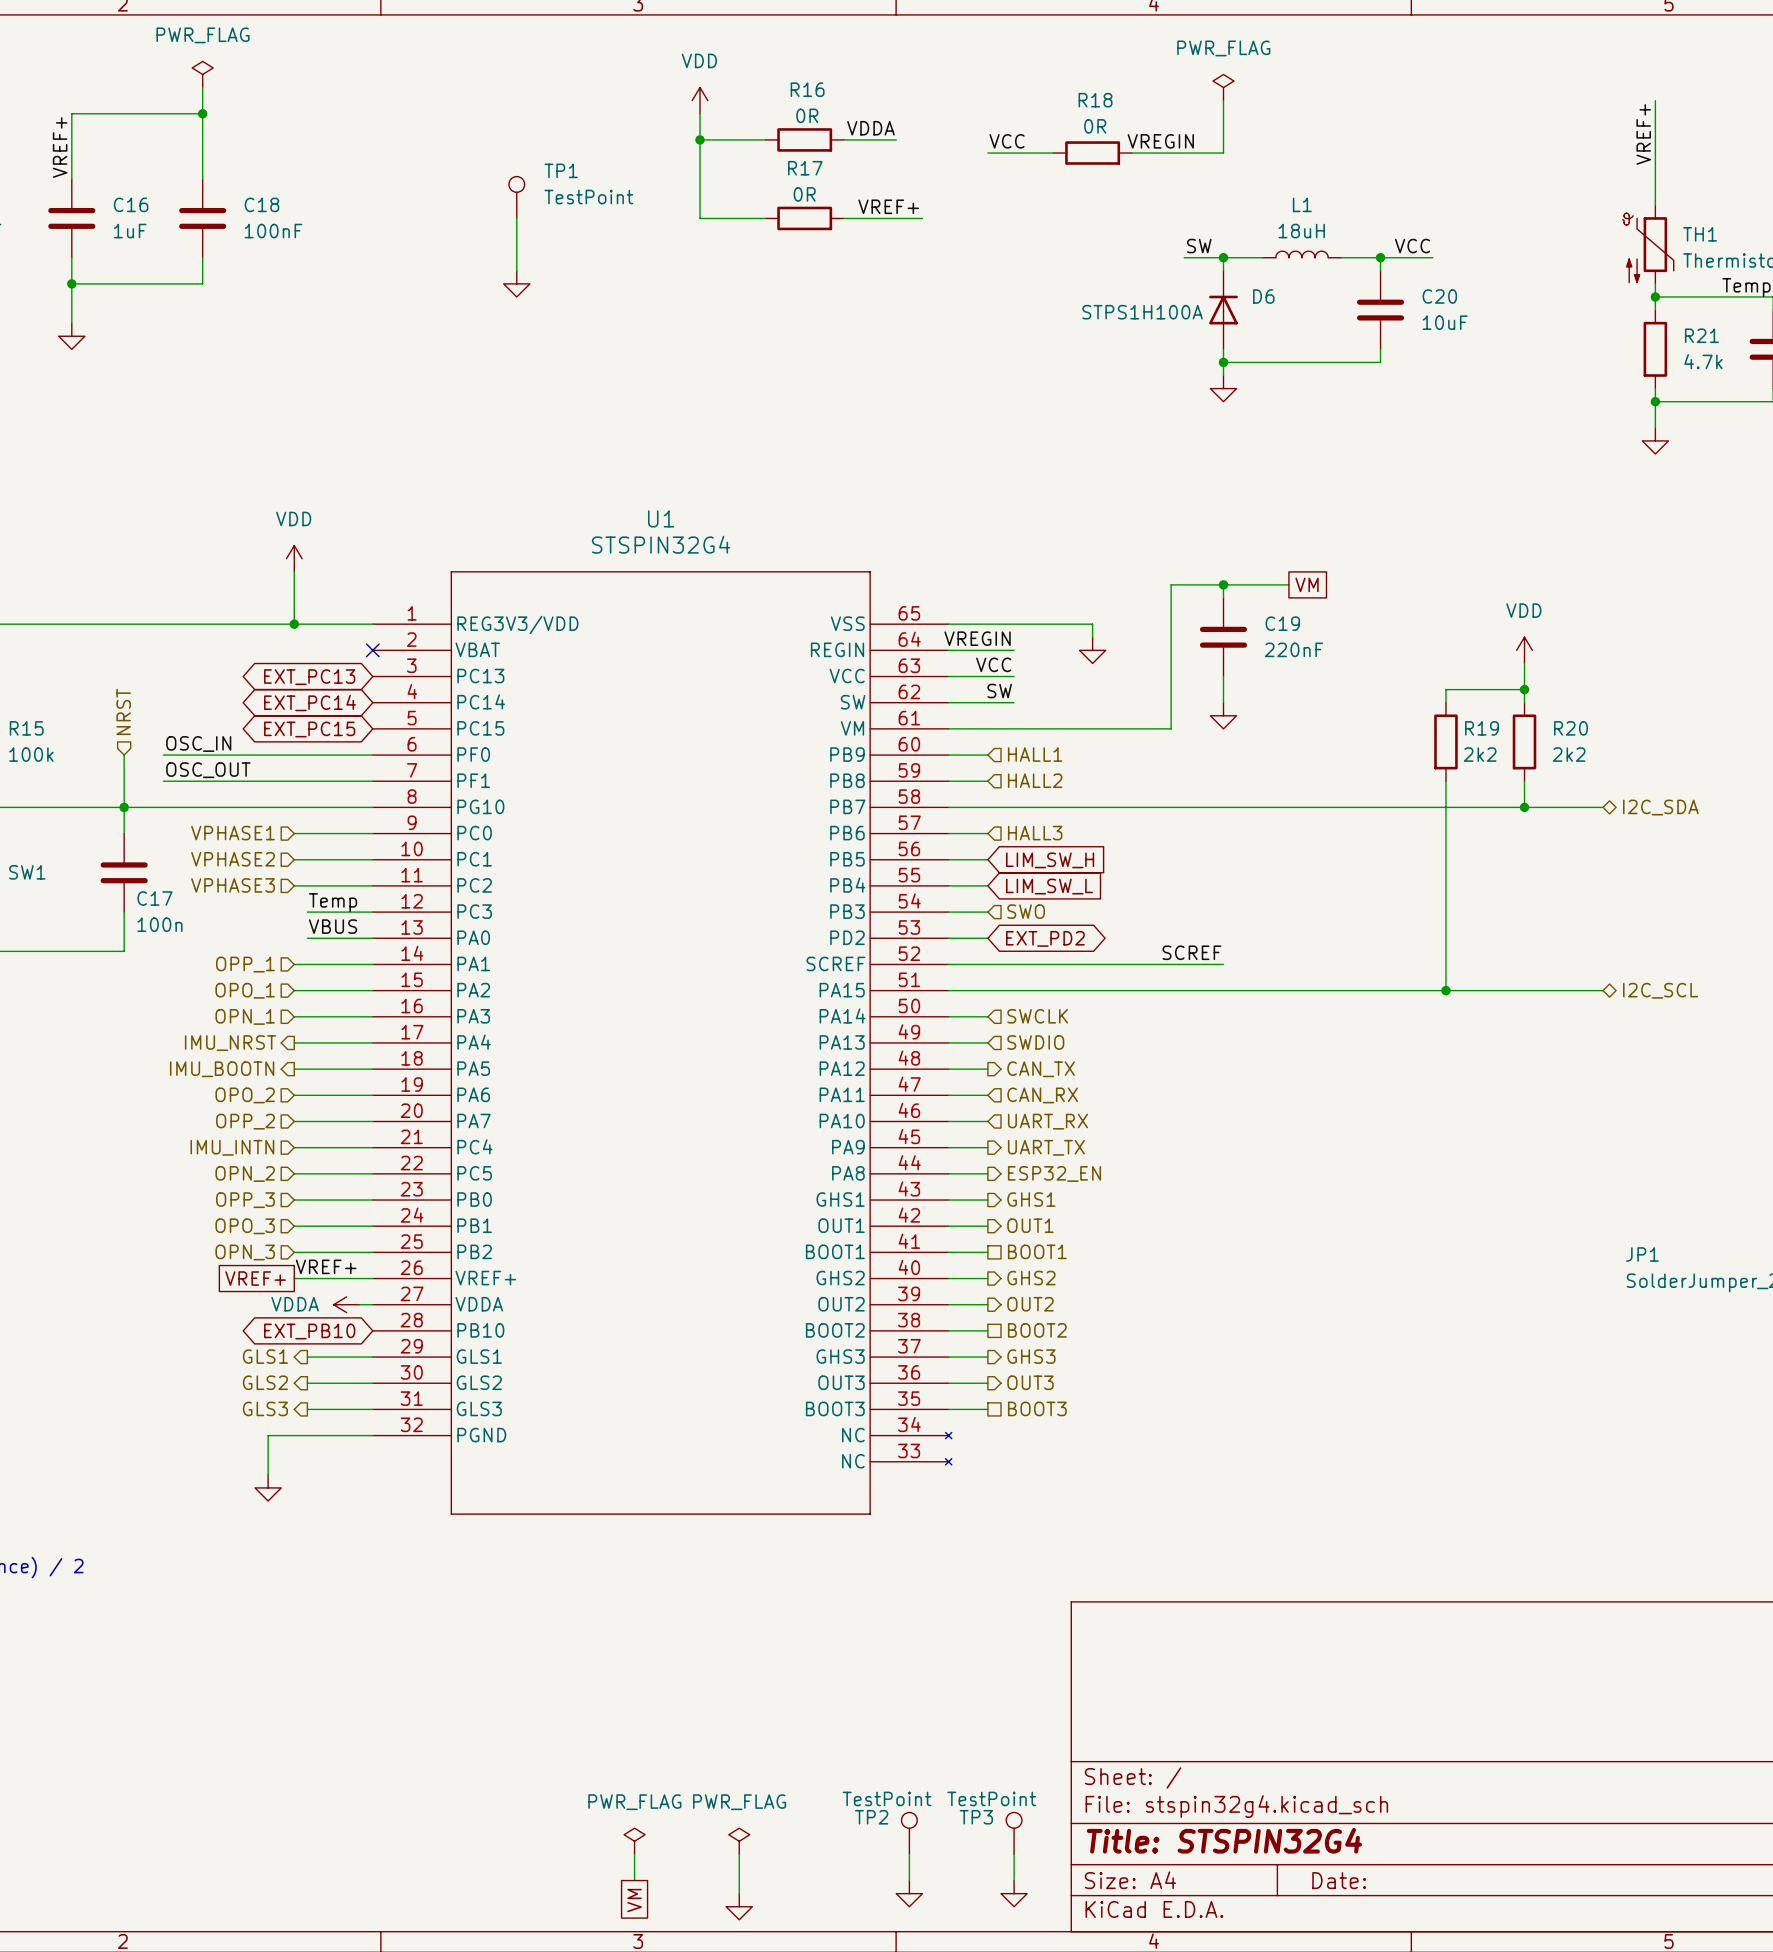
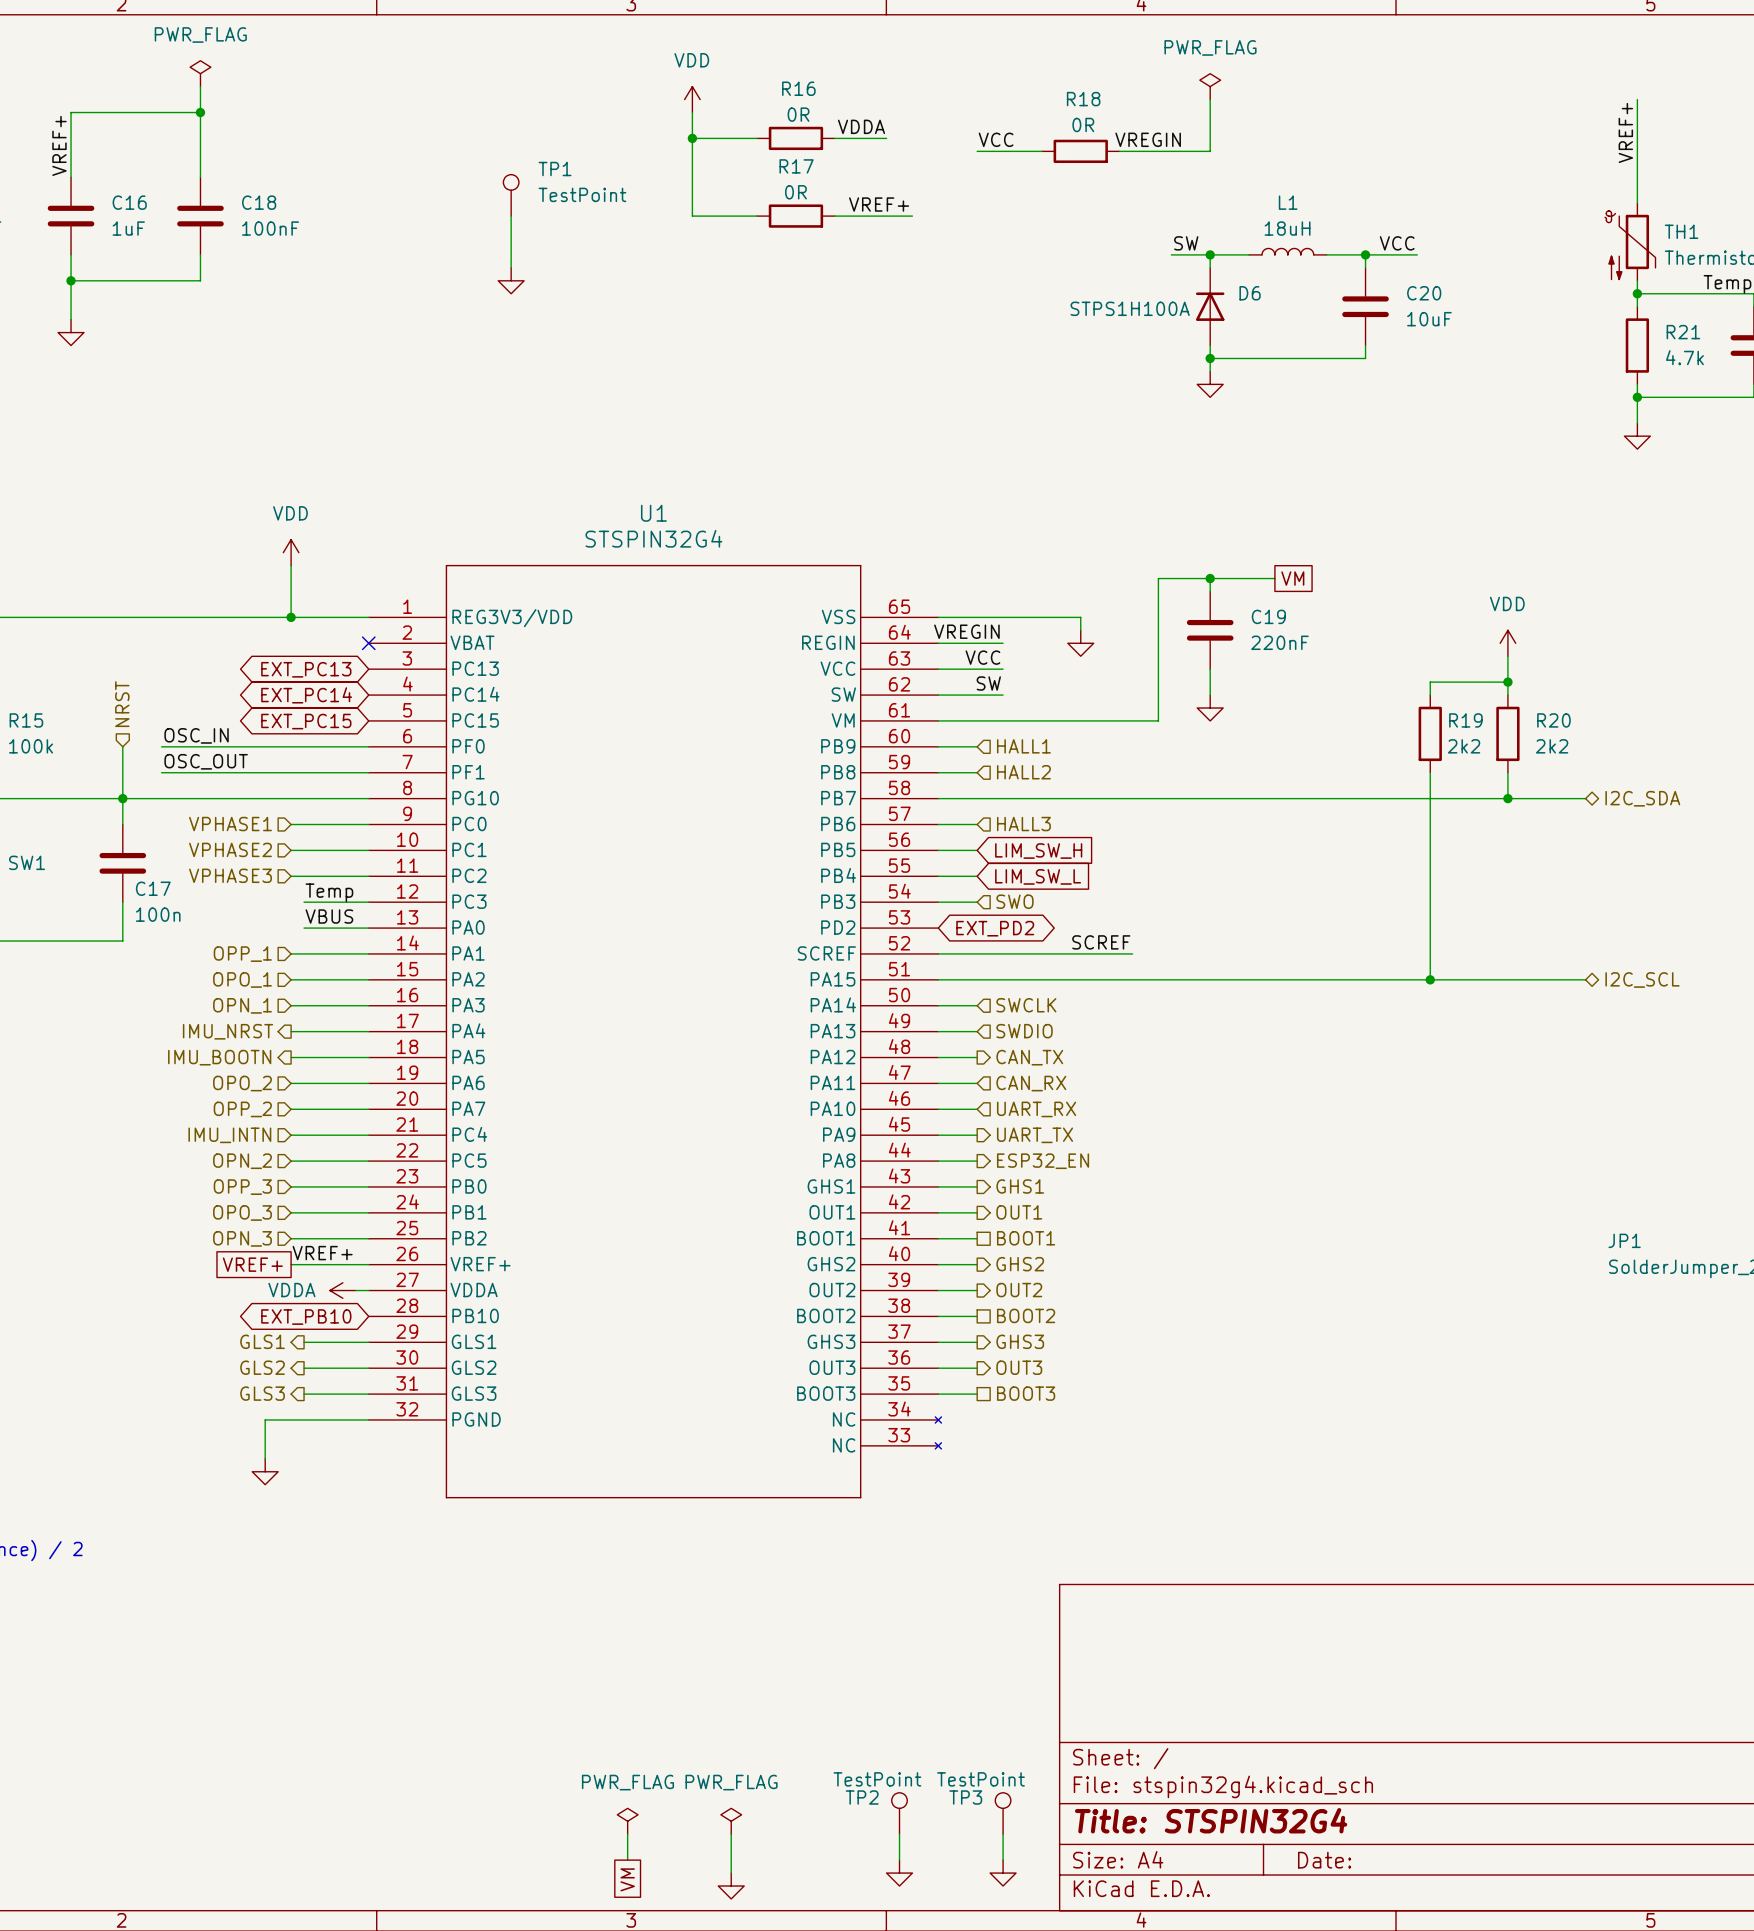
wire: (948, 938) (987, 938) -> none
global label position: EXT_PD2 (1045, 938) -> EXT_PD2 (995, 928)
label position: SCREF (1191, 952) -> SCREF (1101, 942)
wire: (1144, 964) (1223, 964) -> none

